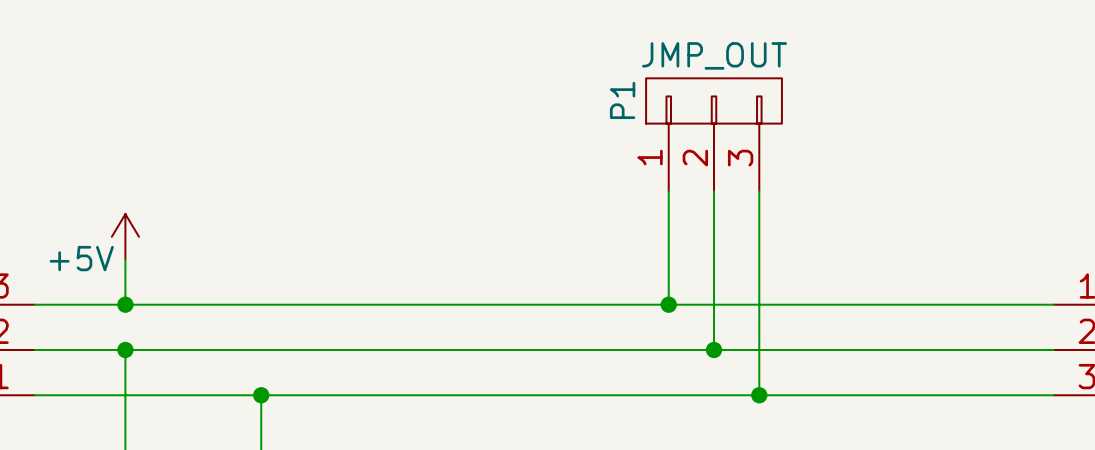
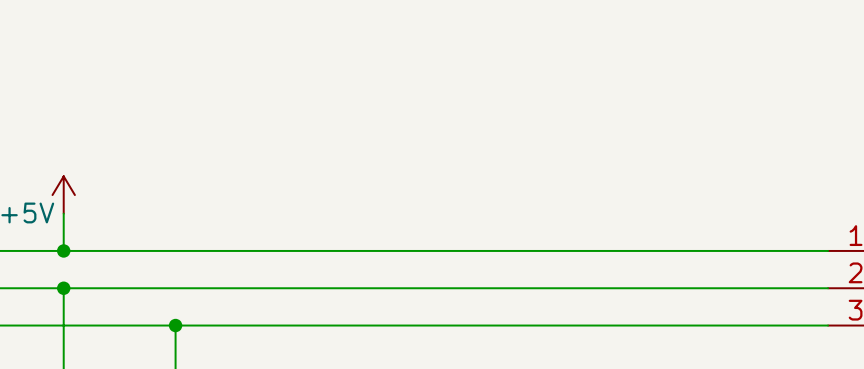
P1: JMP_OUT (714, 134) -> none
wire: (668, 191) (668, 304) -> none
wire: (714, 191) (714, 349) -> none
wire: (759, 191) (759, 395) -> none
junction: (668, 304) -> none
junction: (714, 349) -> none
junction: (759, 395) -> none

